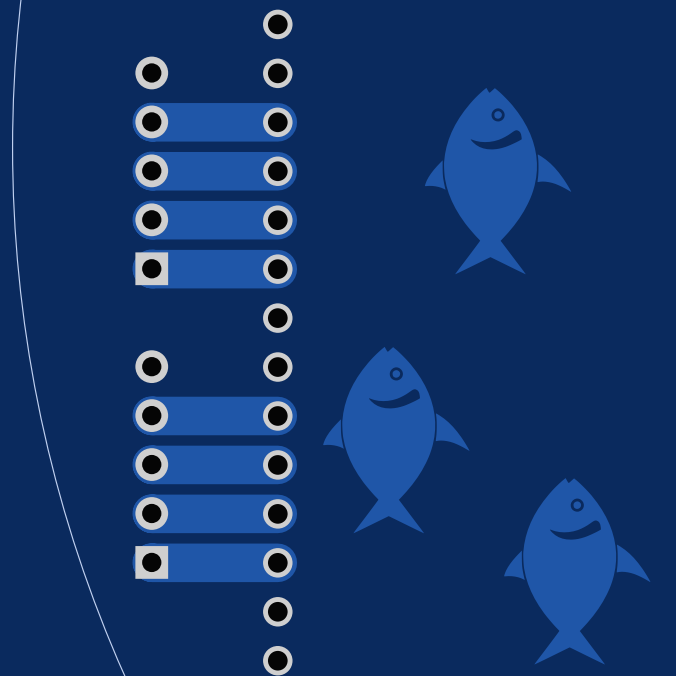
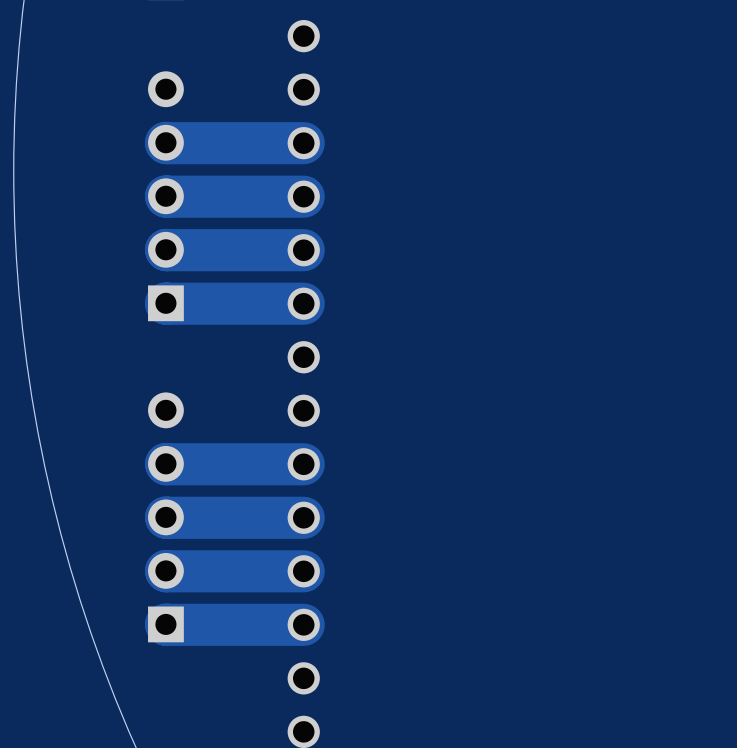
drawing: [424, 87, 572, 275] -> none
drawing: [323, 346, 470, 534] -> none
drawing: [504, 478, 651, 665] -> none

